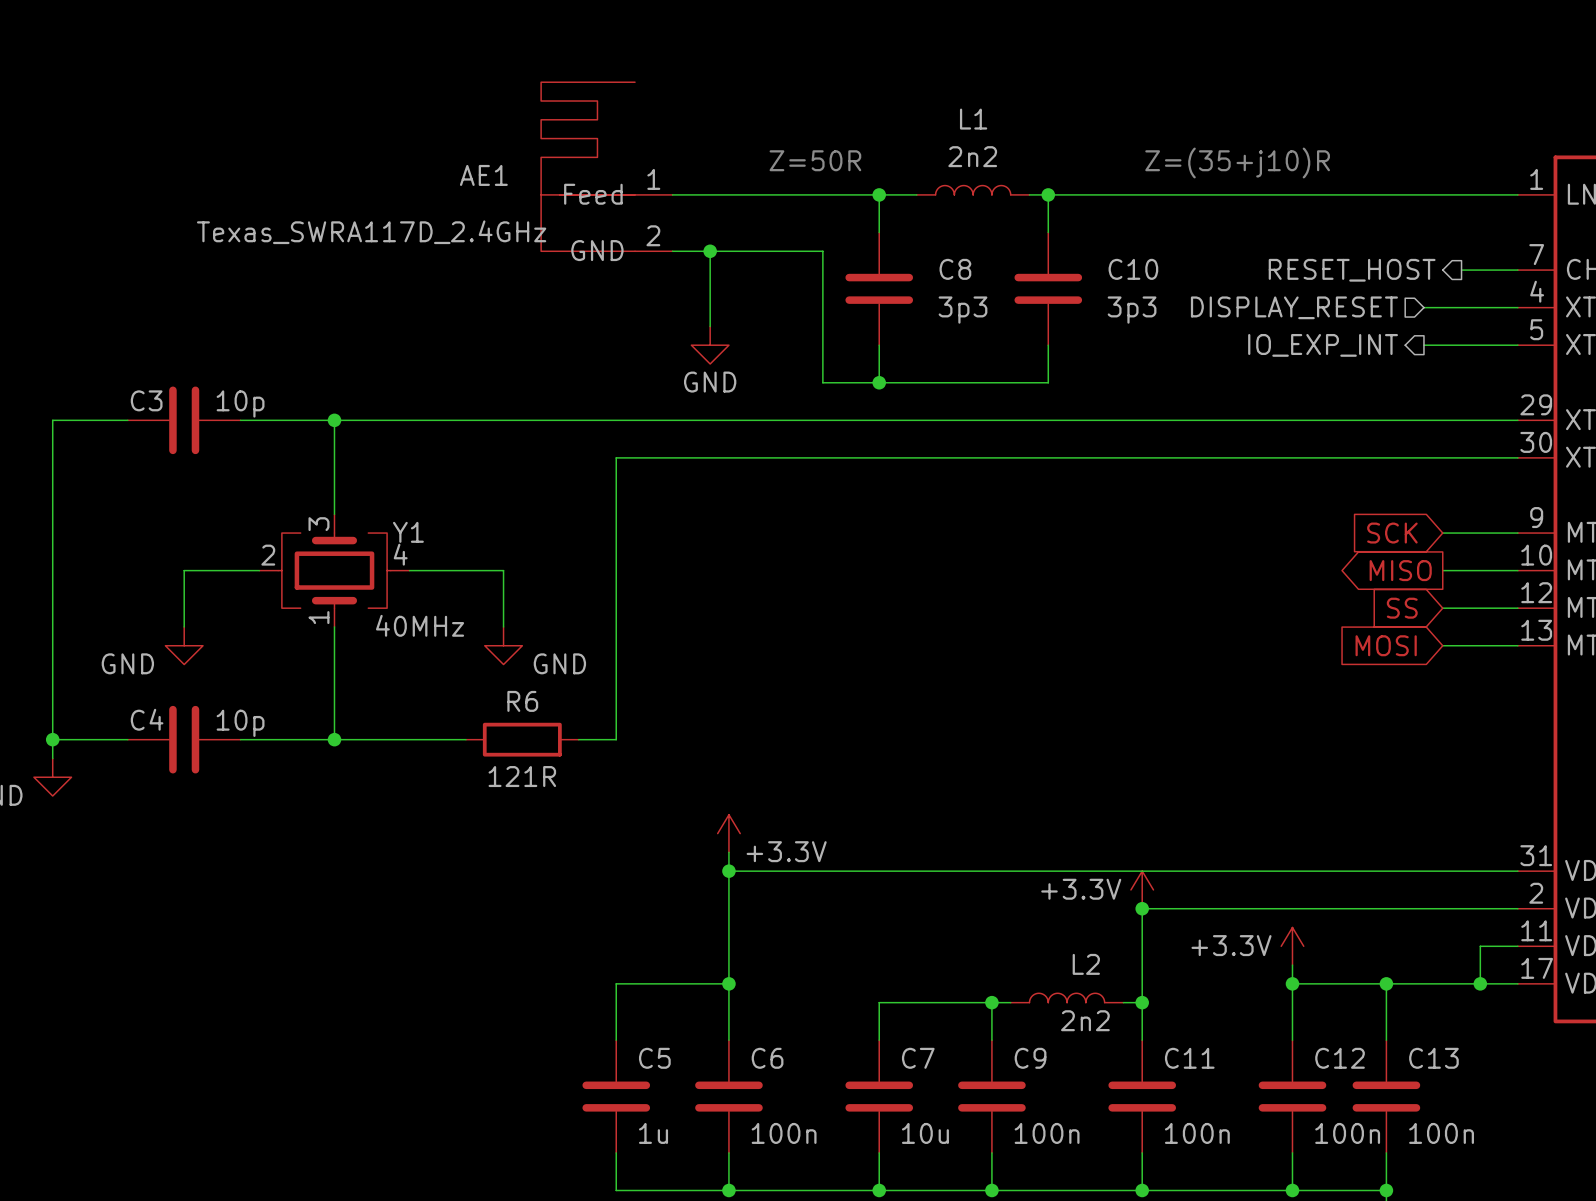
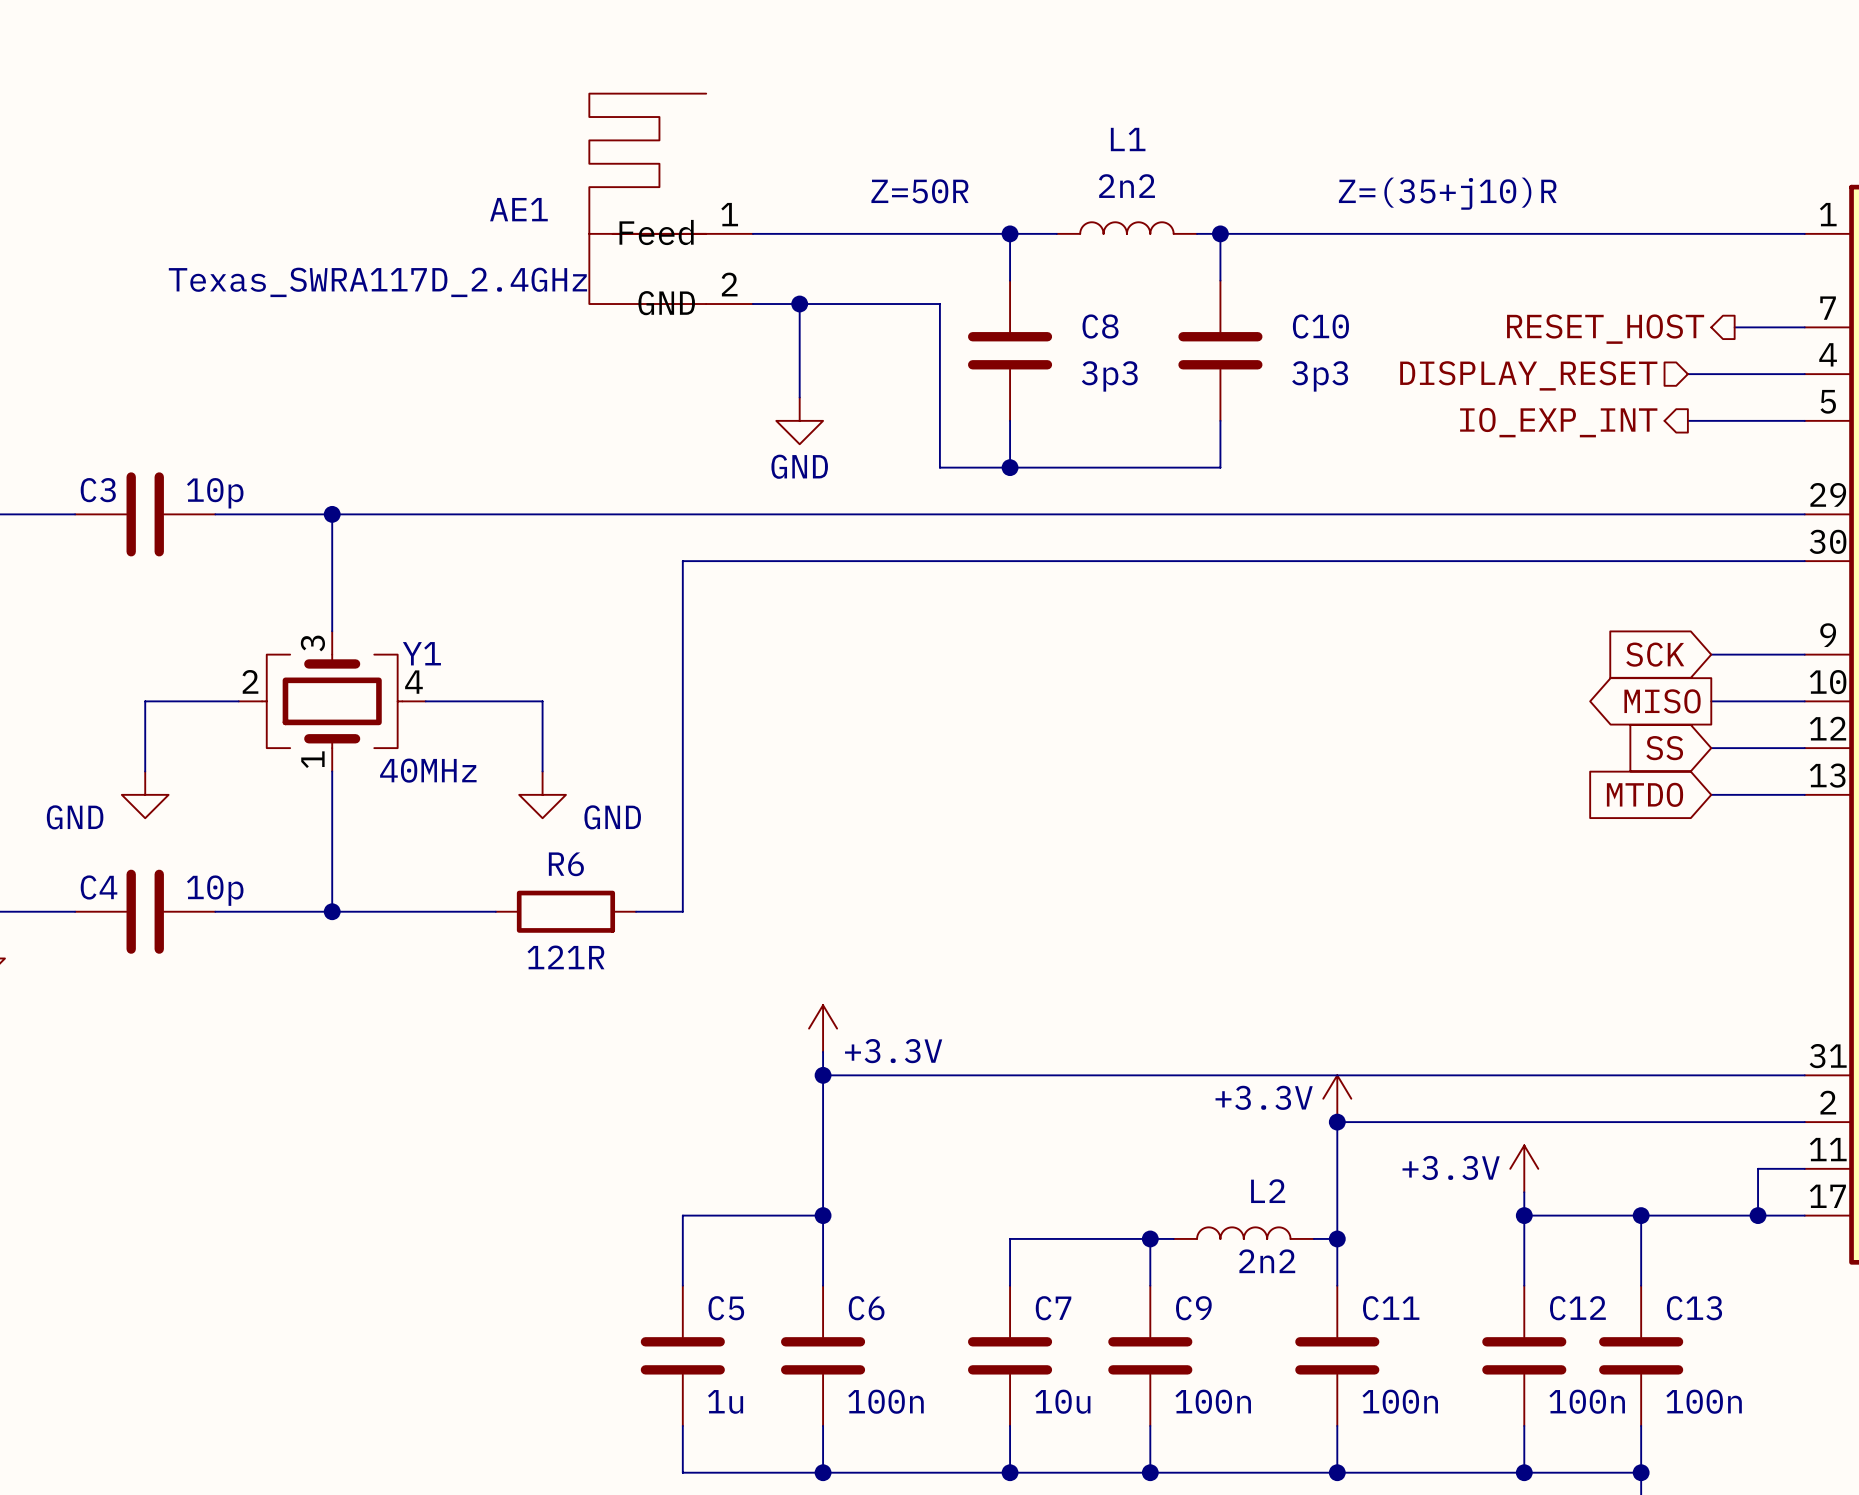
global label: MOSI (1386, 645) -> MTDO (1645, 794)

